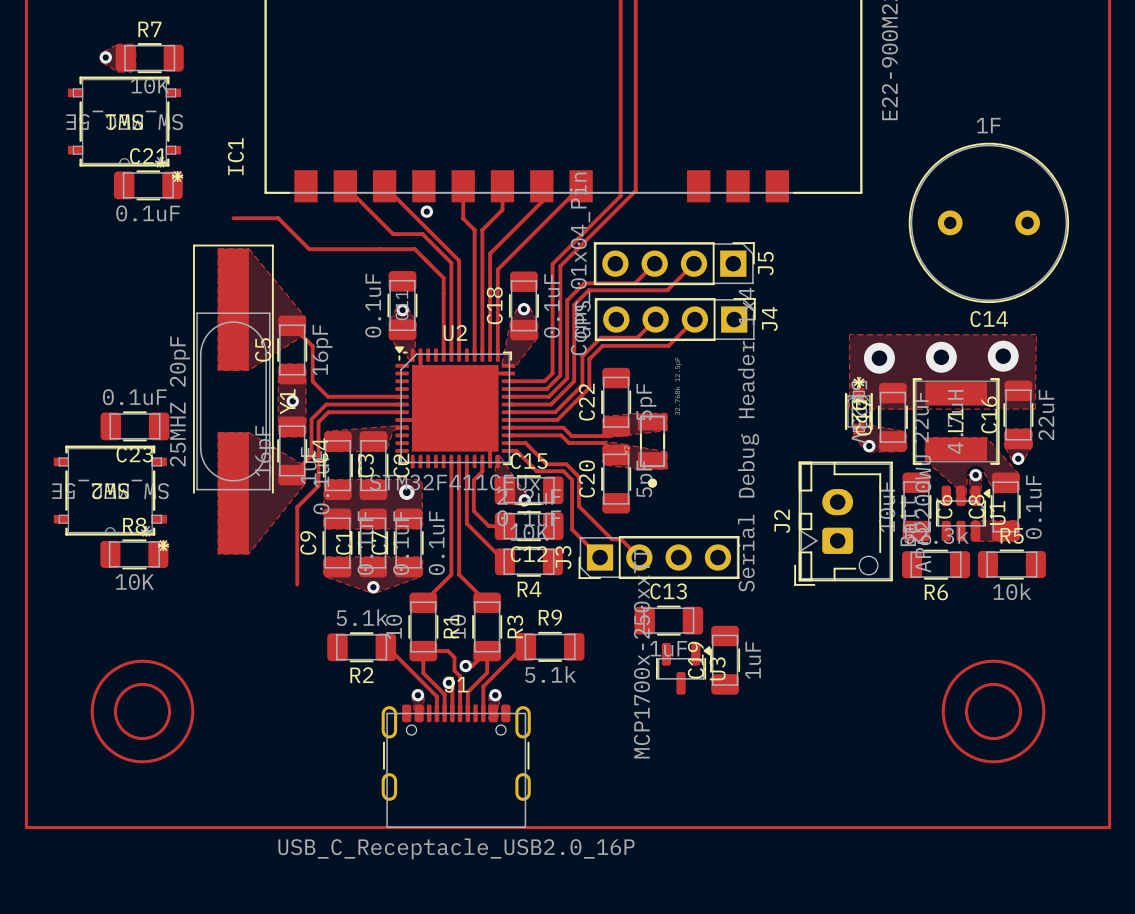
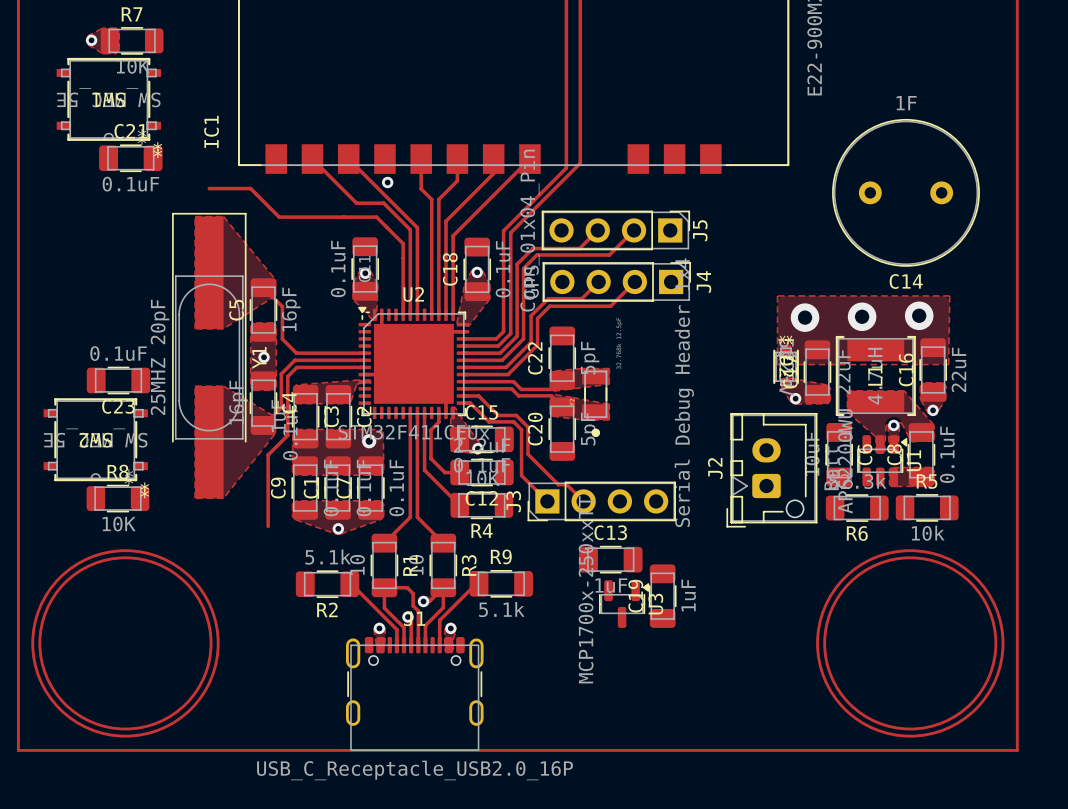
drawing: none -> [31, 549, 220, 738]
drawing: none -> [816, 549, 1005, 738]
drawing: [90, 659, 195, 764] -> none
drawing: [941, 659, 1046, 764] -> none

